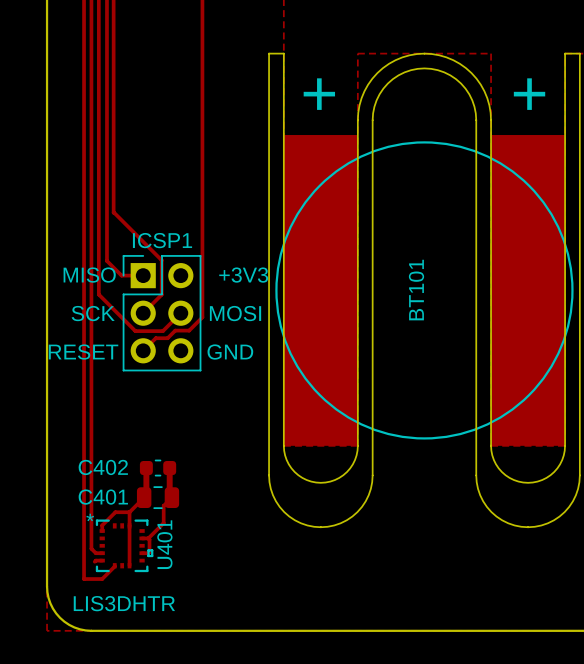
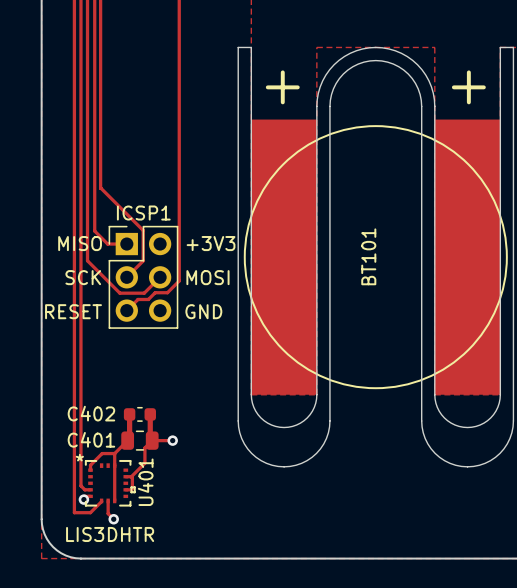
track: none -> (152, 440) (172, 440)
via: none -> (172, 440)
via: none -> (83, 499)
track: none -> (108, 500) (108, 513) (113, 519)
via: none -> (113, 519)

